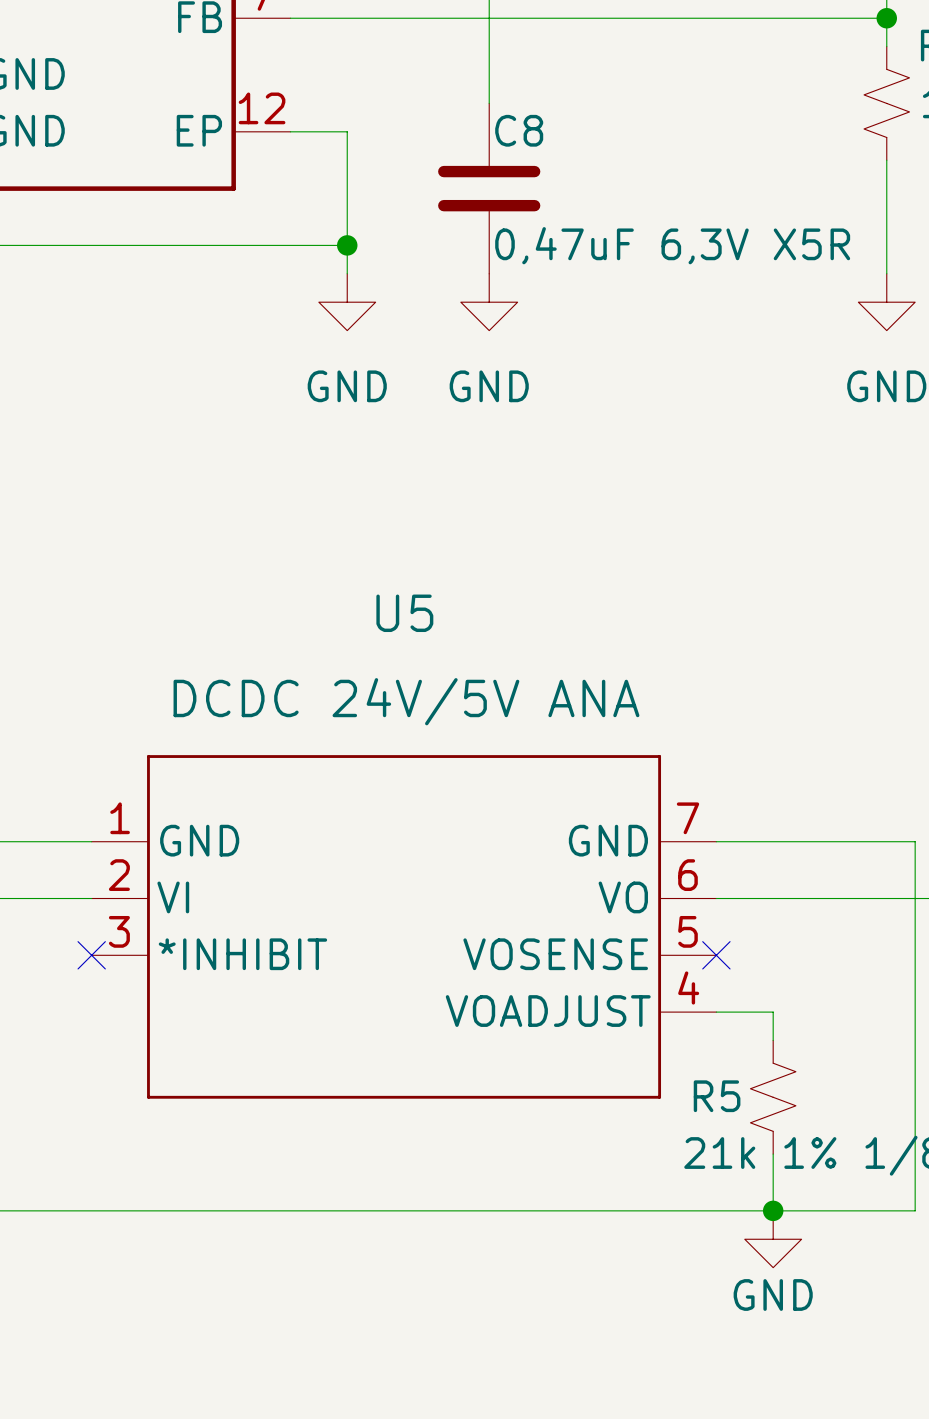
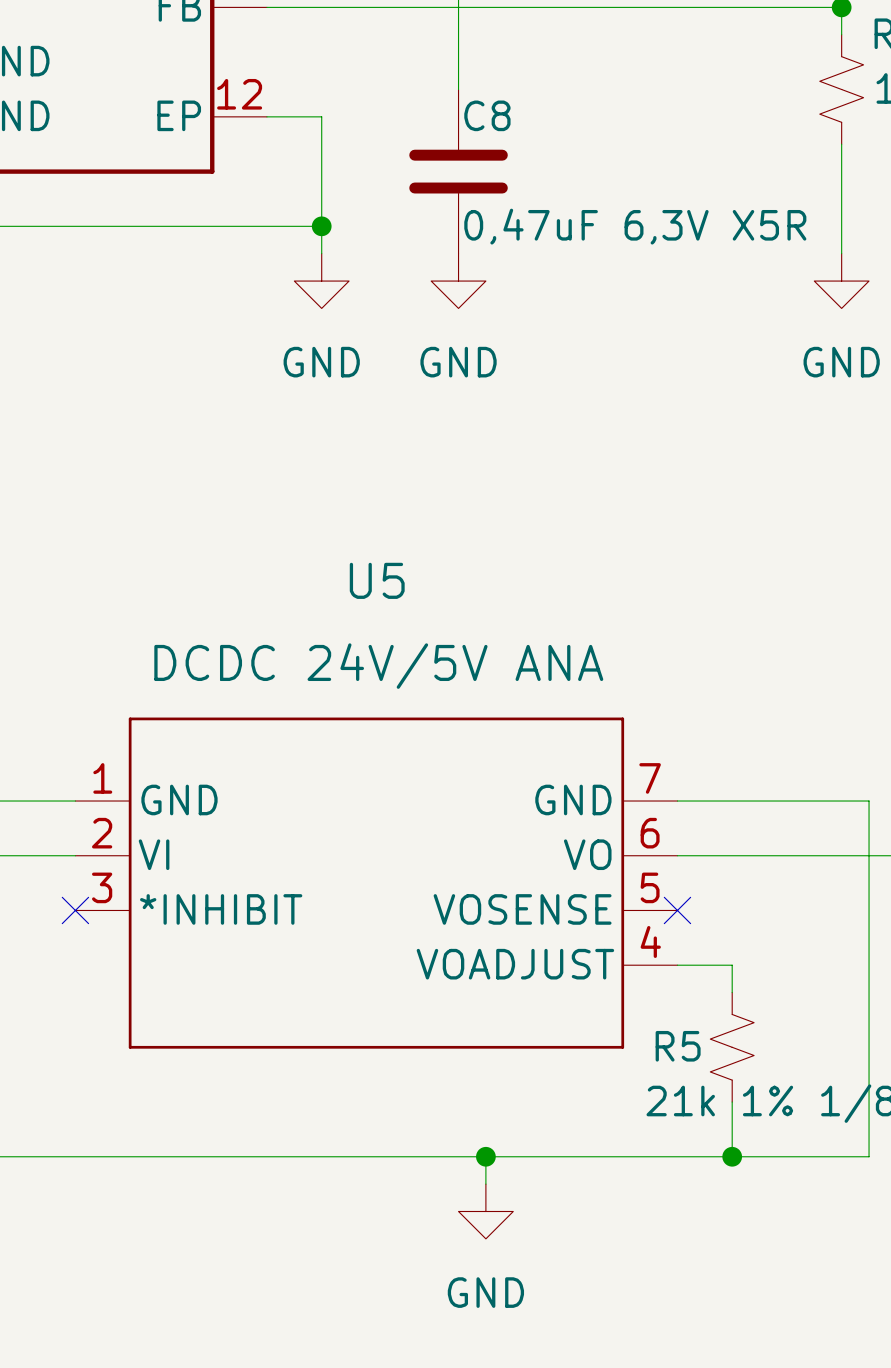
wire: none -> (485, 1156) (485, 1184)
junction: none -> (485, 1156)
power symbol position: GND (773, 1239) -> GND (485, 1211)
power symbol text position: GND (773, 1294) -> GND (485, 1292)

